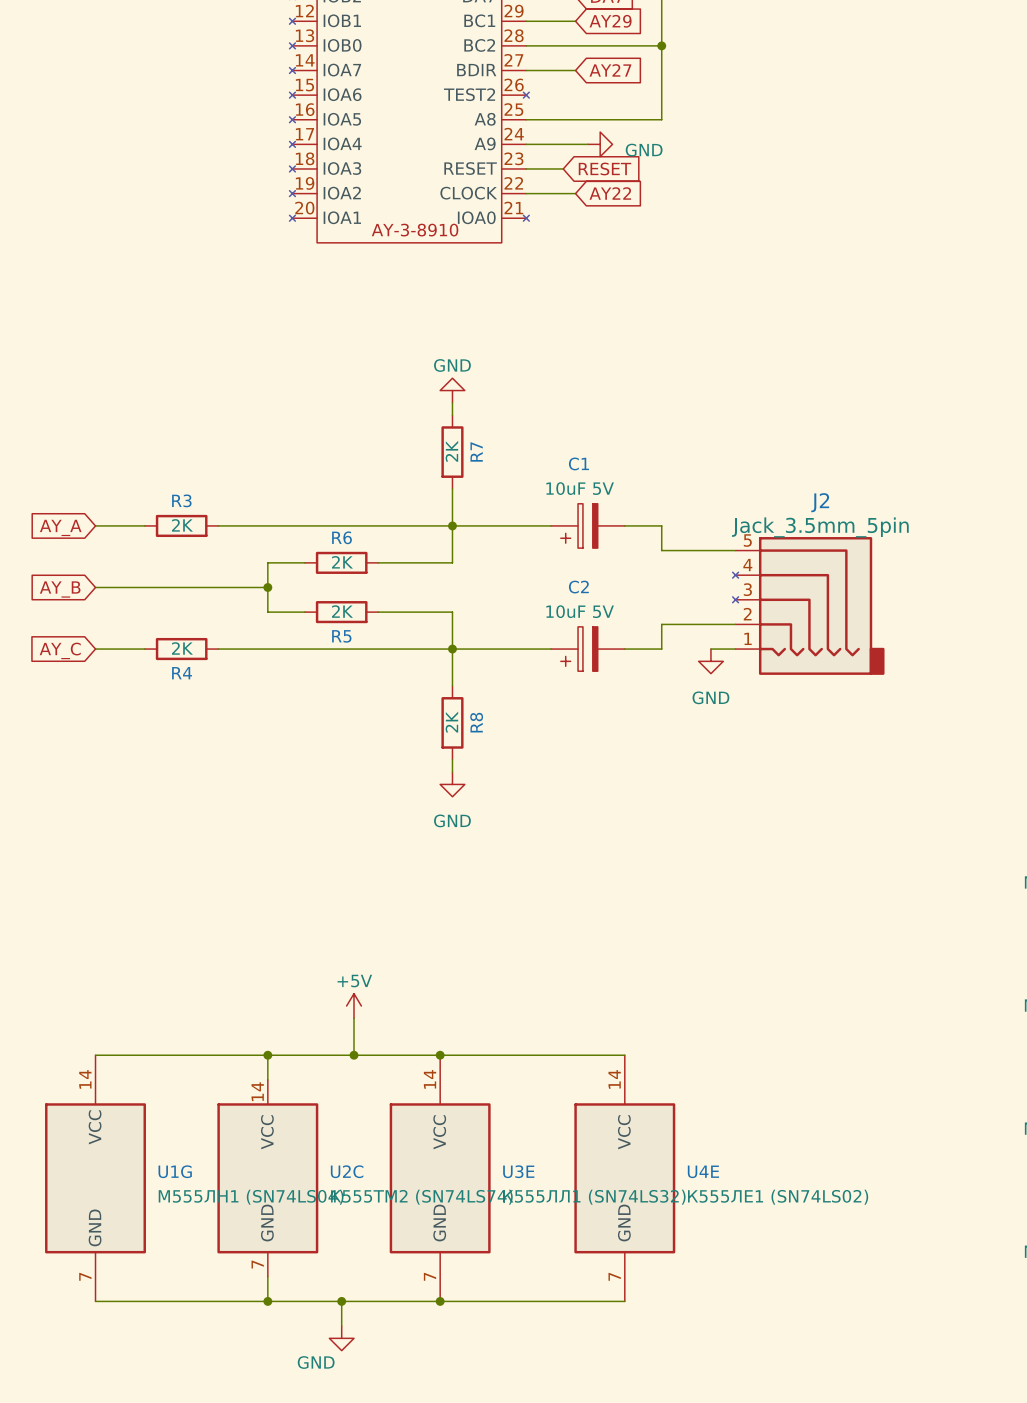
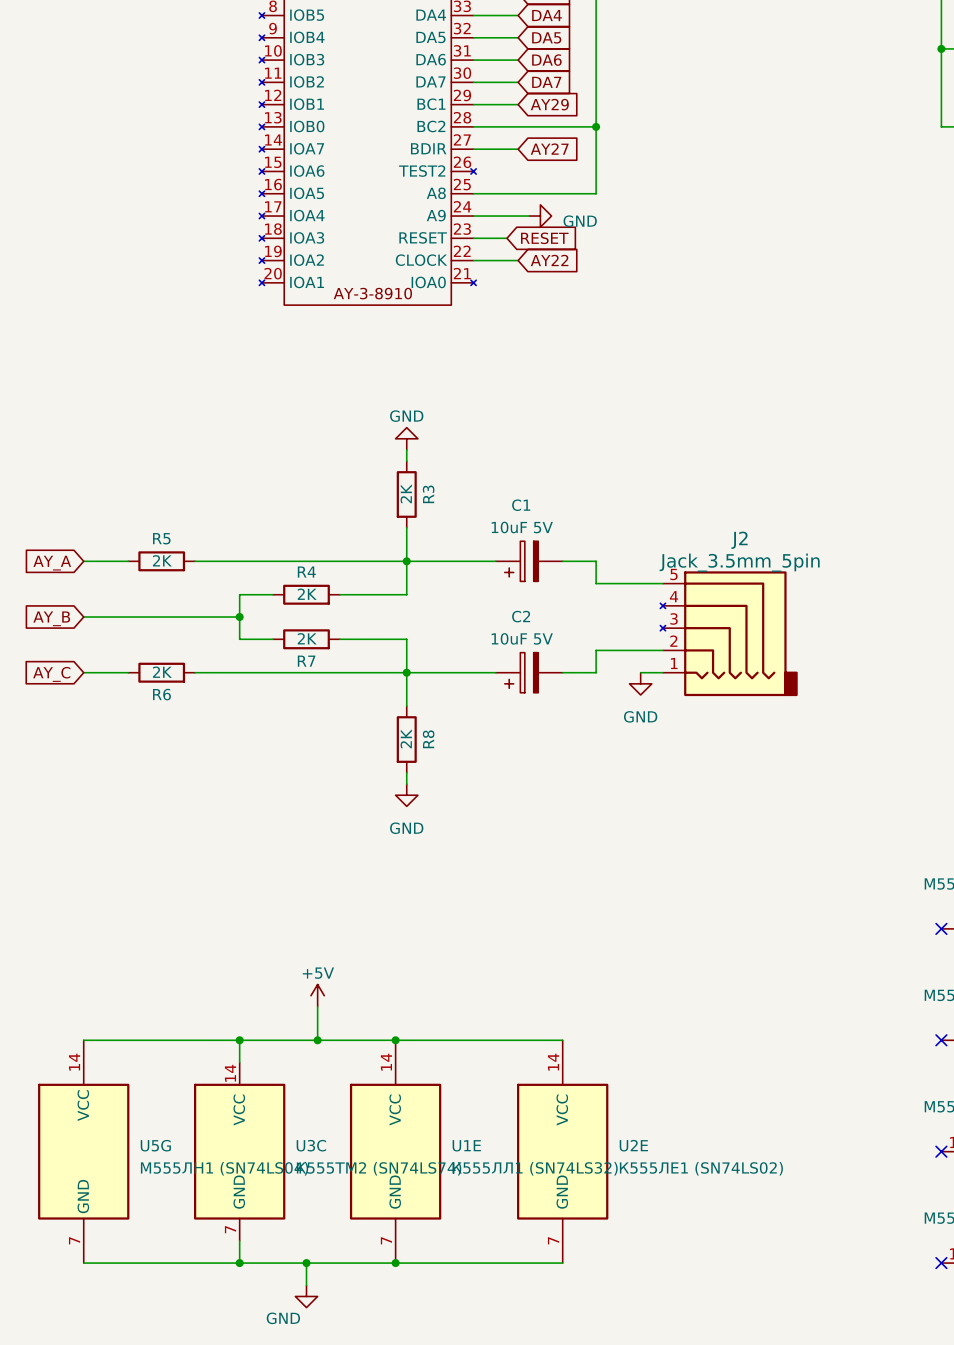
R7 name: R7 (476, 451) -> R3 (428, 494)
R3 name: R3 (181, 500) -> R5 (161, 538)
R6 name: R6 (341, 537) -> R4 (306, 572)
R5 name: R5 (341, 636) -> R7 (306, 661)
R4 name: R4 (182, 673) -> R6 (161, 694)
U1G name: U1G (175, 1171) -> U5G (155, 1145)
U2C name: U2C (347, 1171) -> U3C (311, 1145)
U3E name: U3E (518, 1171) -> U1E (466, 1145)
U4E name: U4E (703, 1171) -> U2E (633, 1145)

